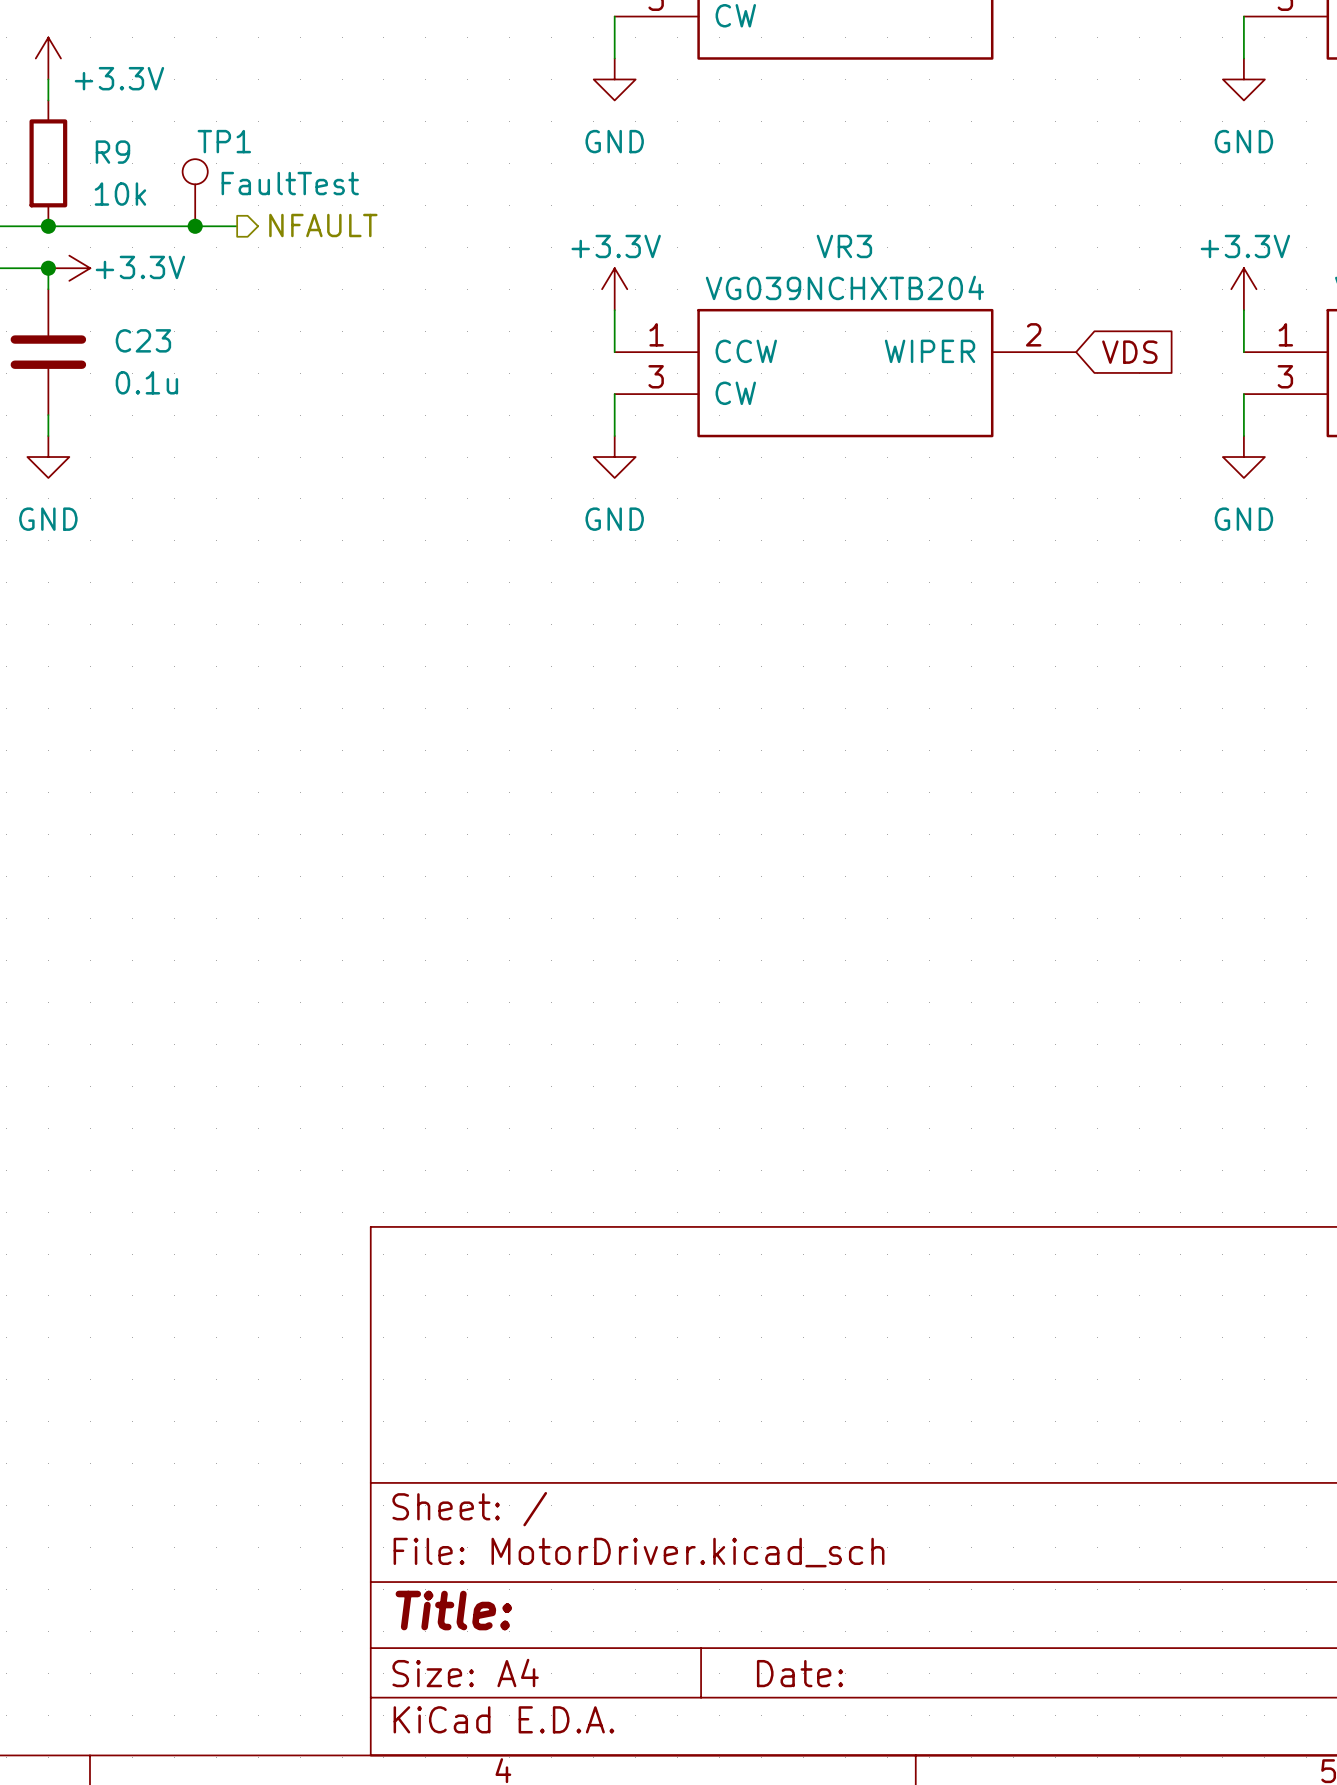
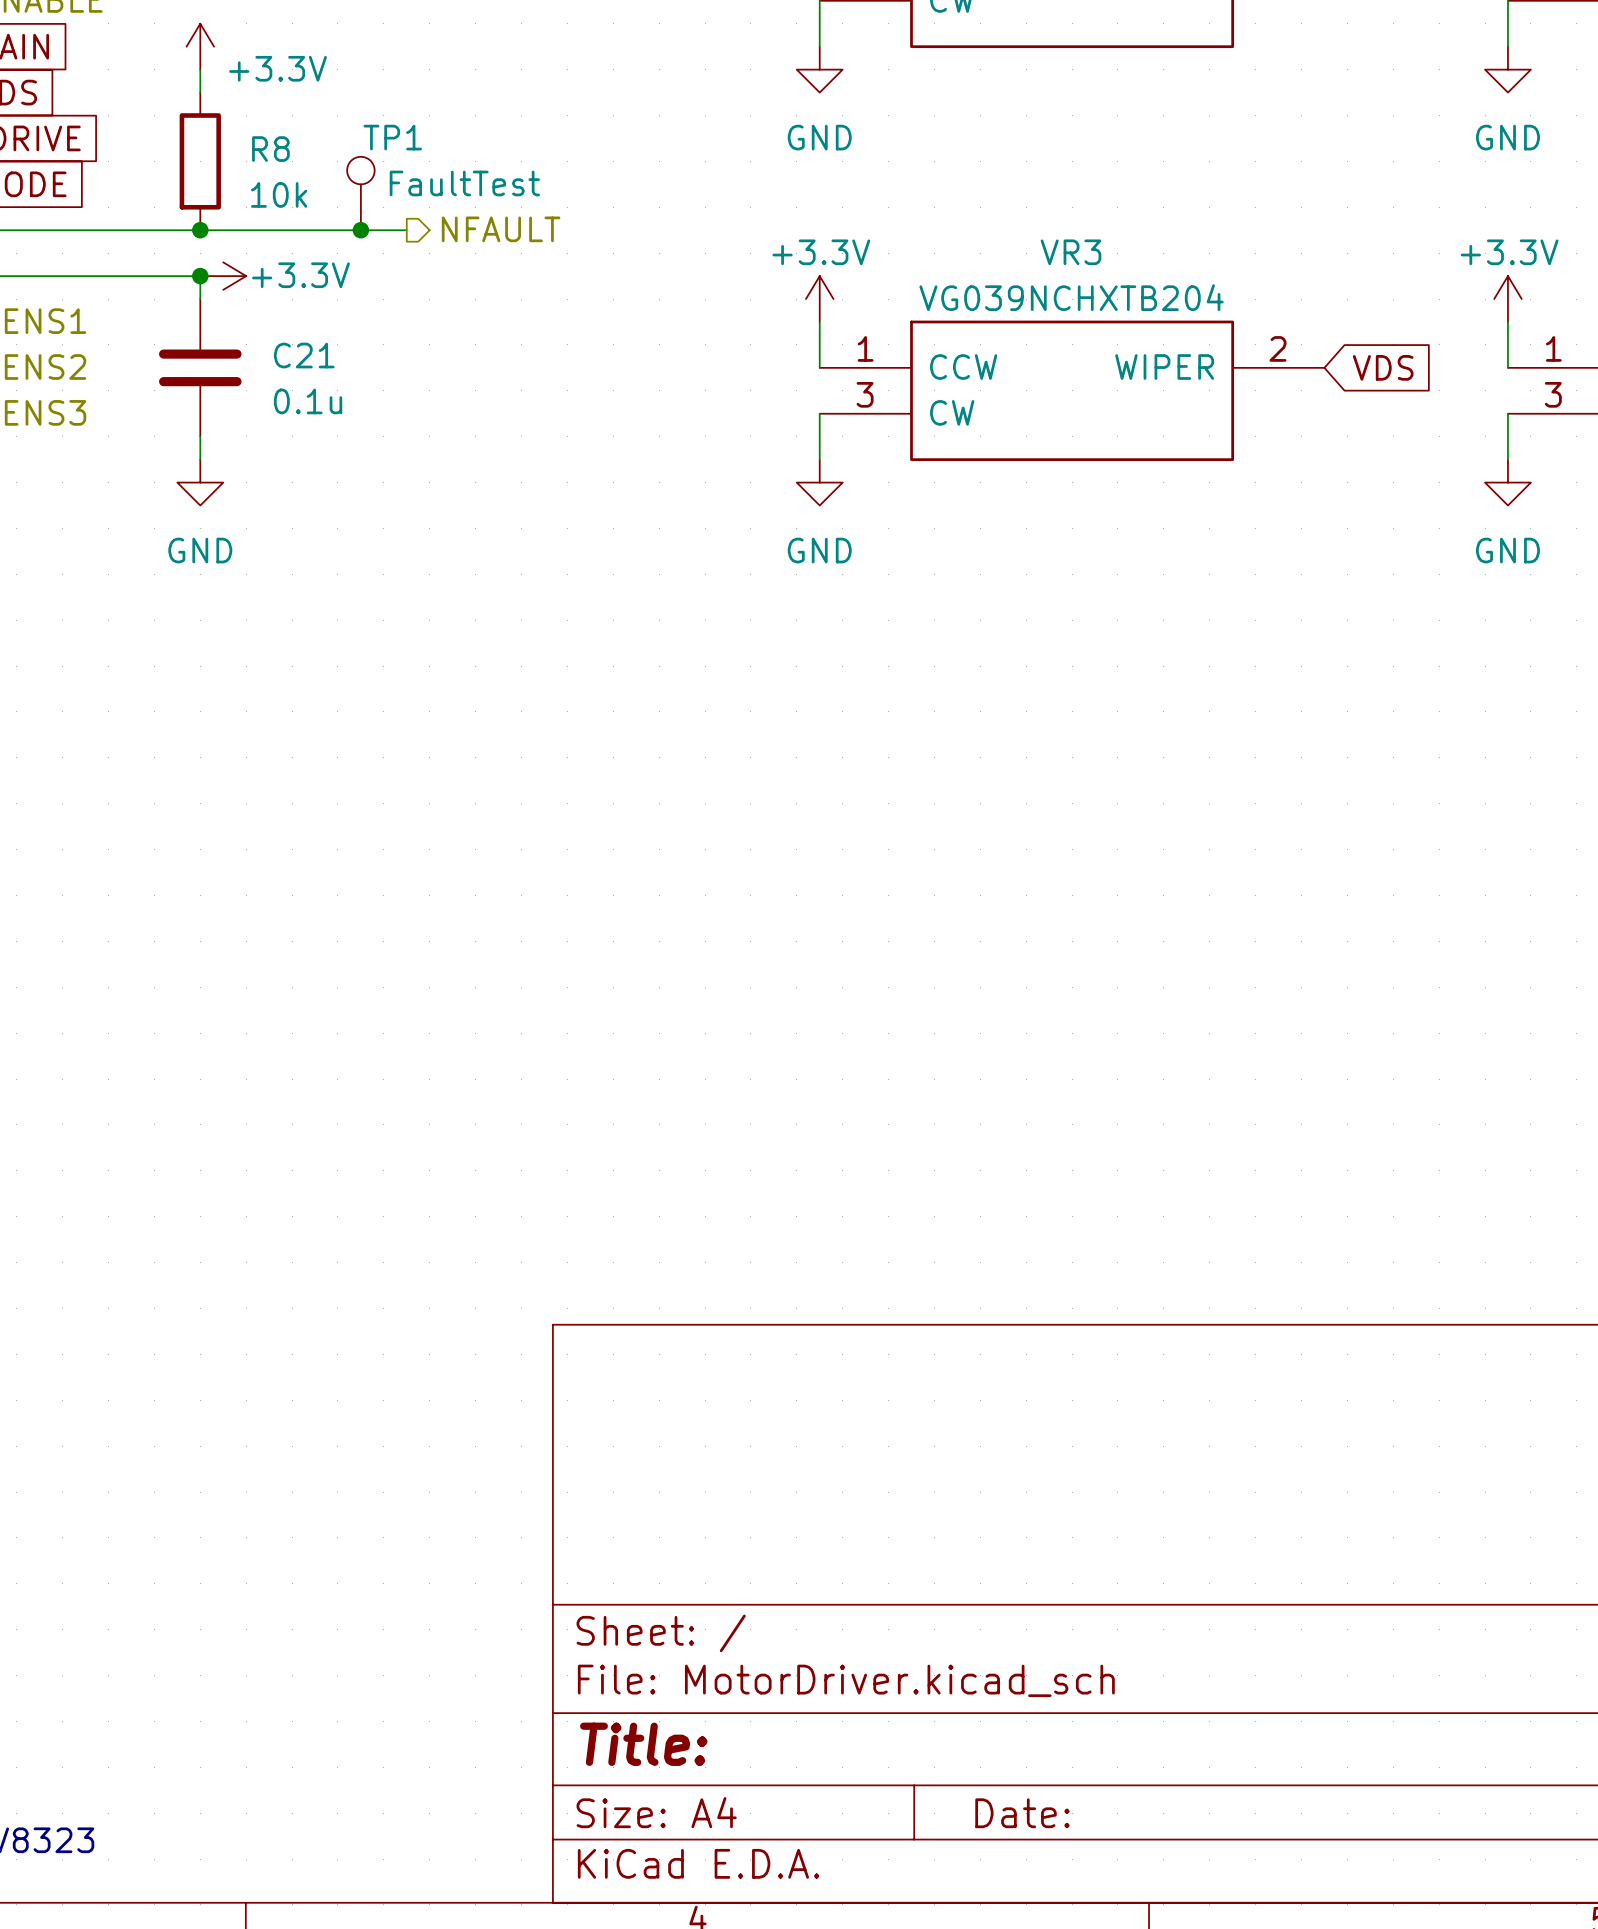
R9 name: R9 (112, 152) -> R8 (270, 149)
C23 name: C23 (143, 340) -> C21 (304, 355)

